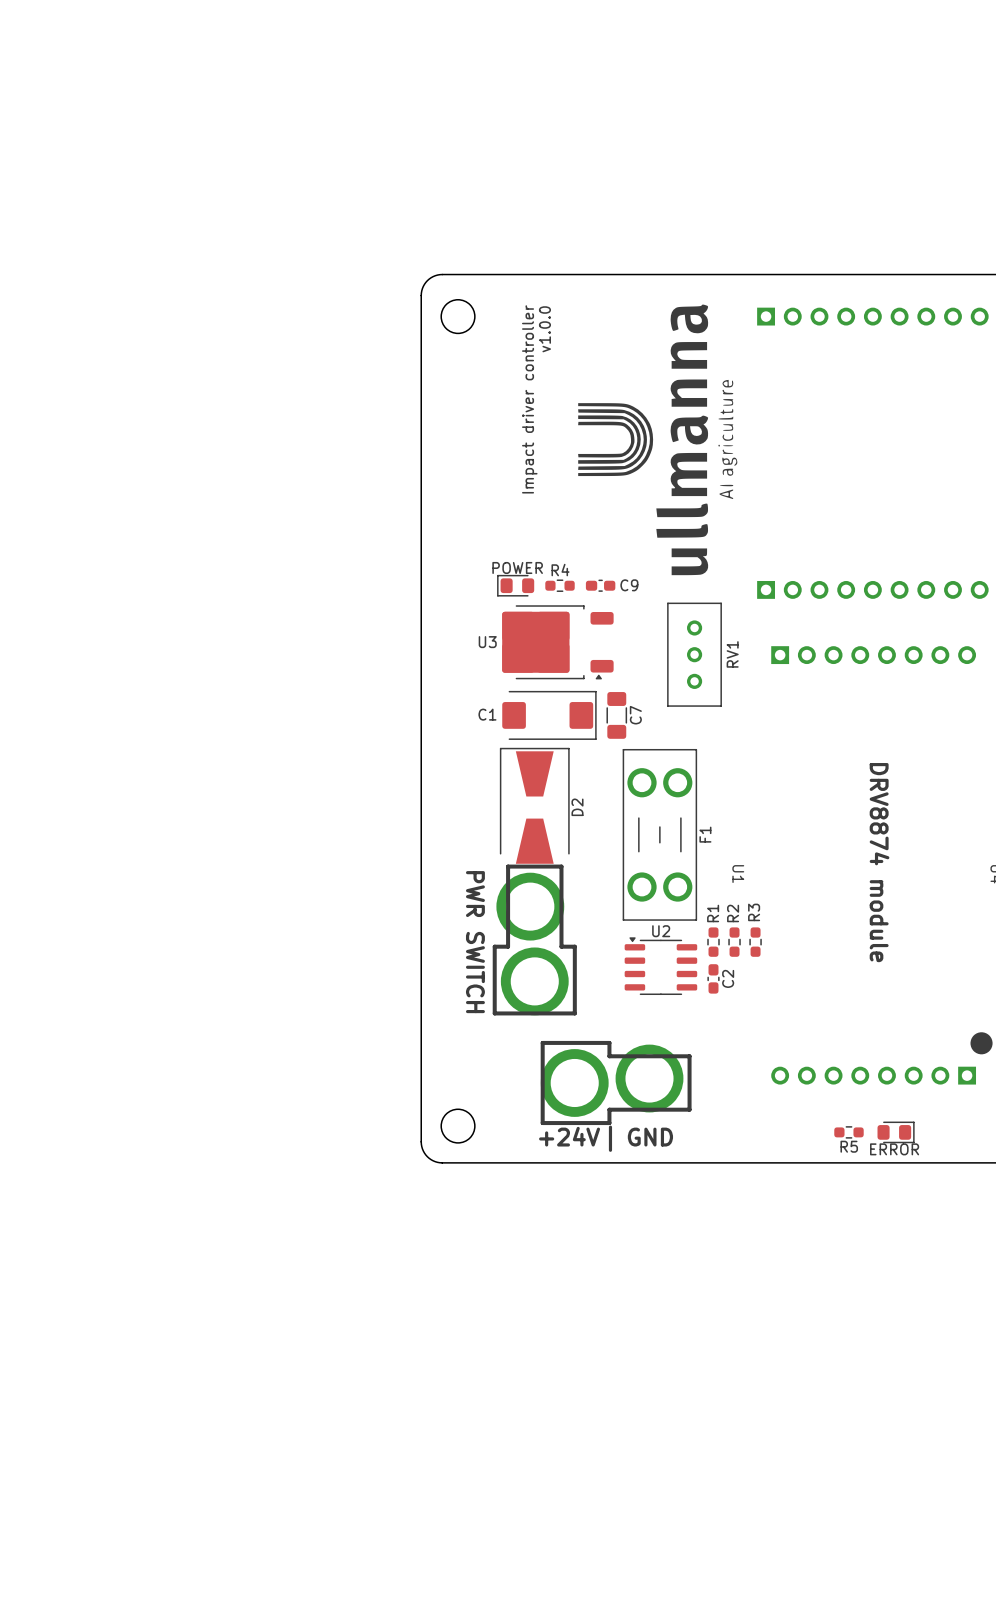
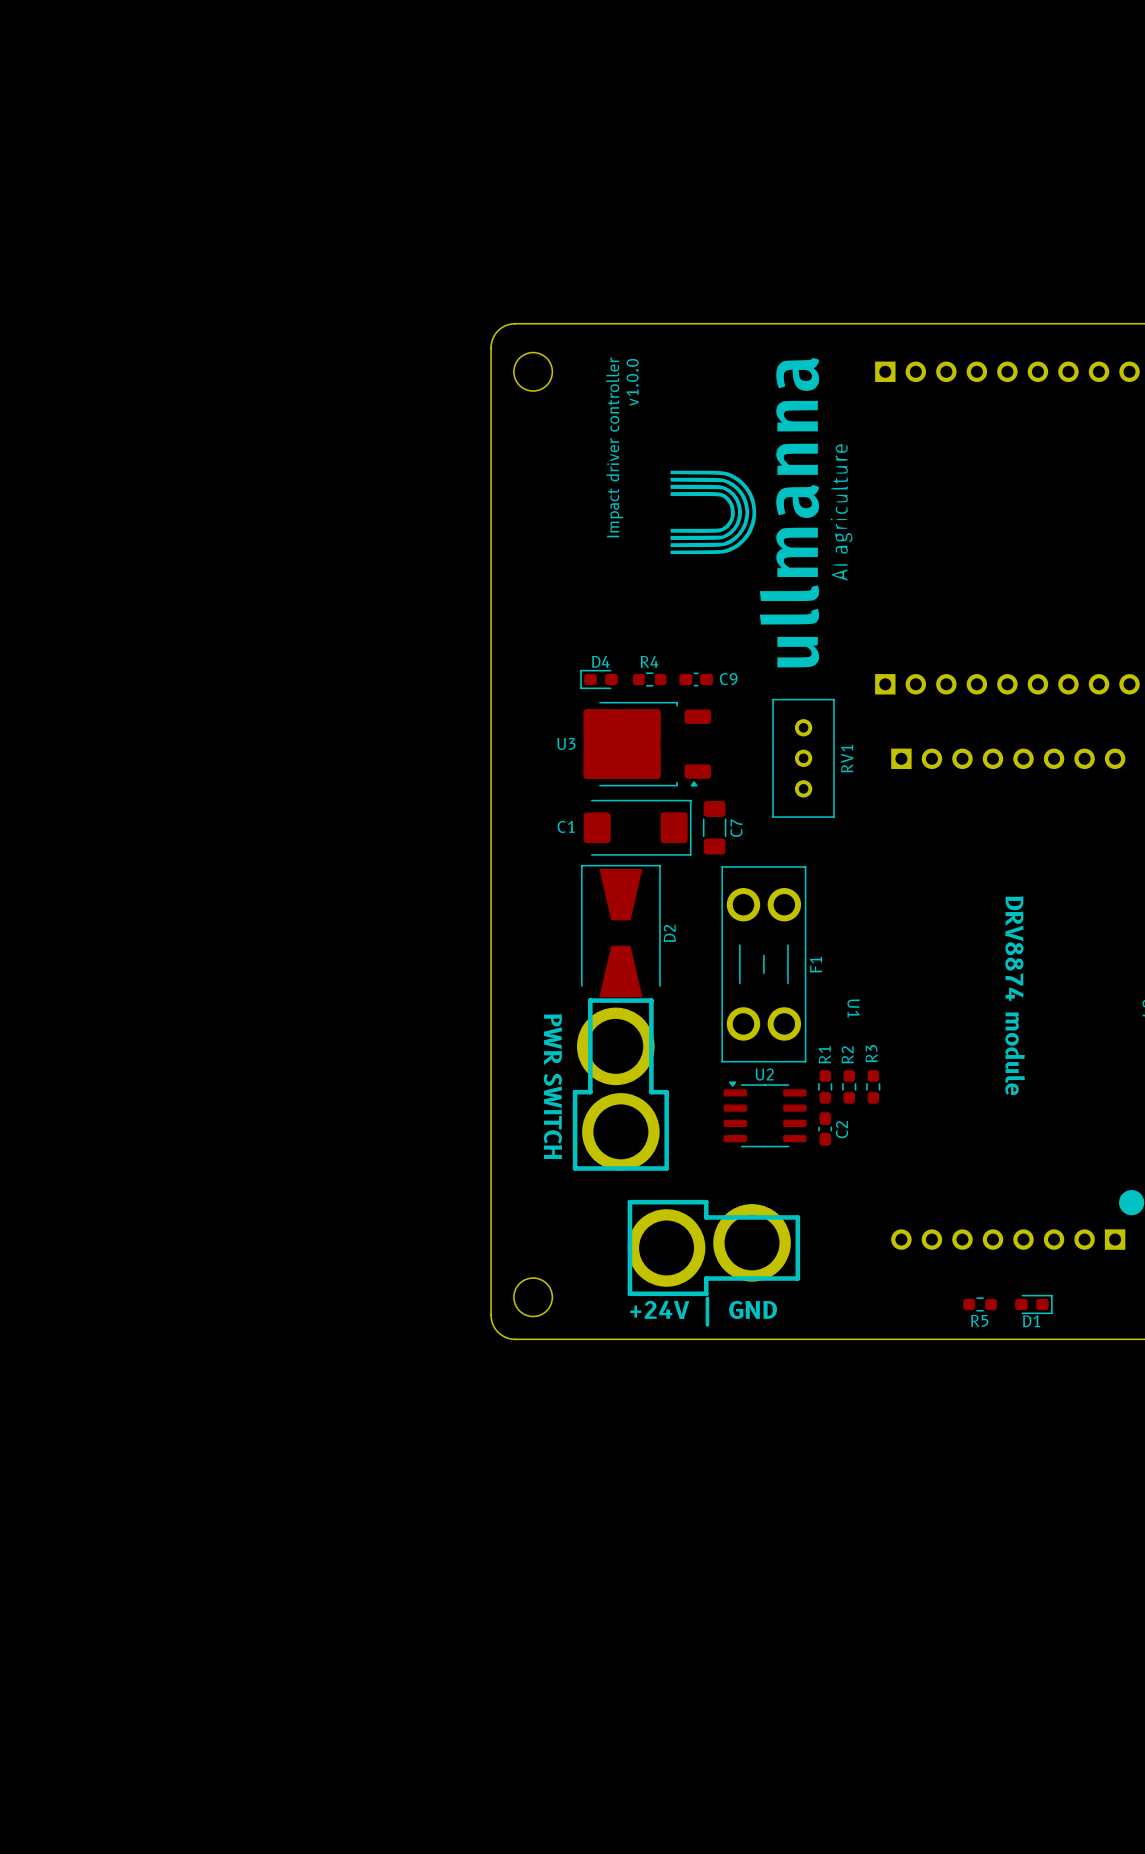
POWER: (515, 585) -> none
D4: none -> (599, 679)
ERROR: (896, 1132) -> none
D1: none -> (1033, 1304)

